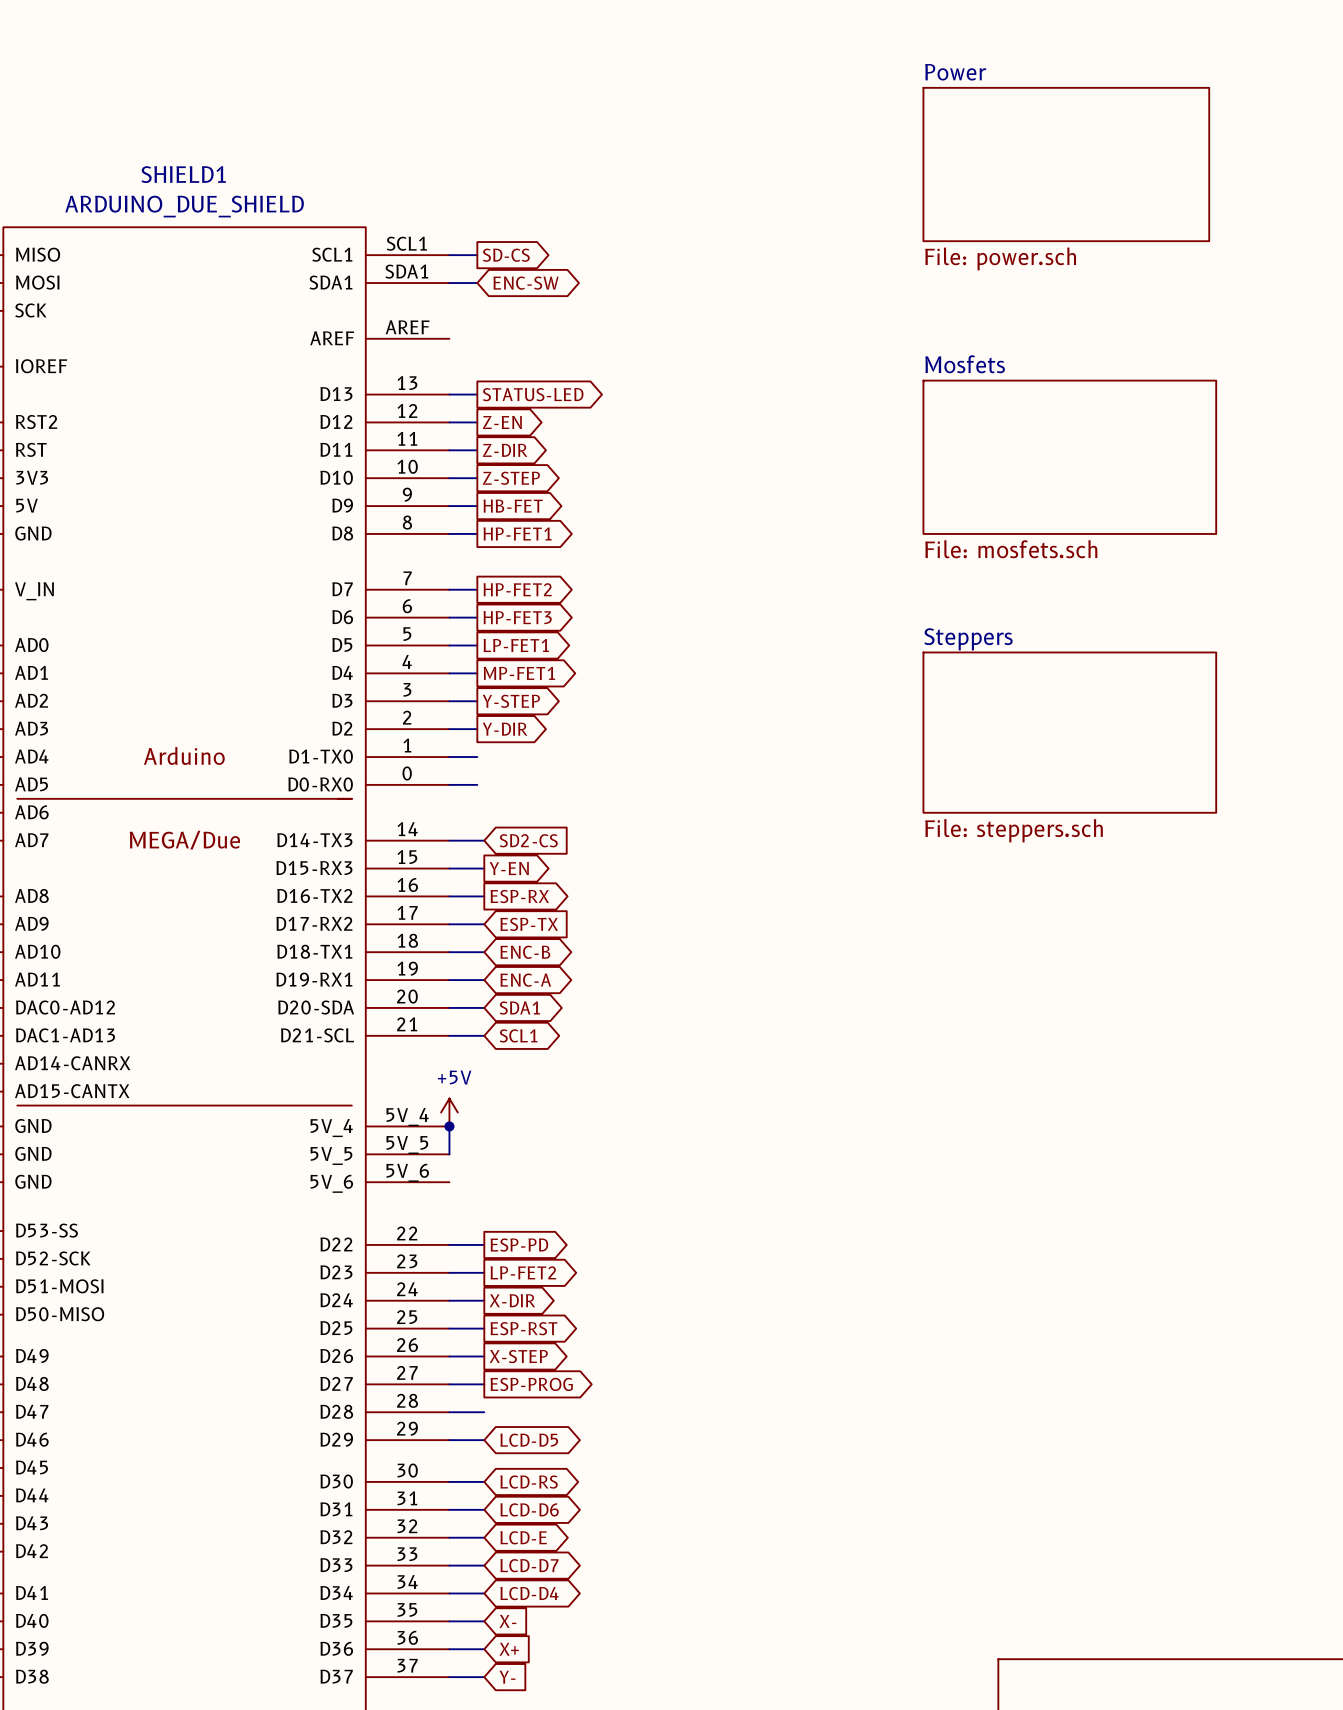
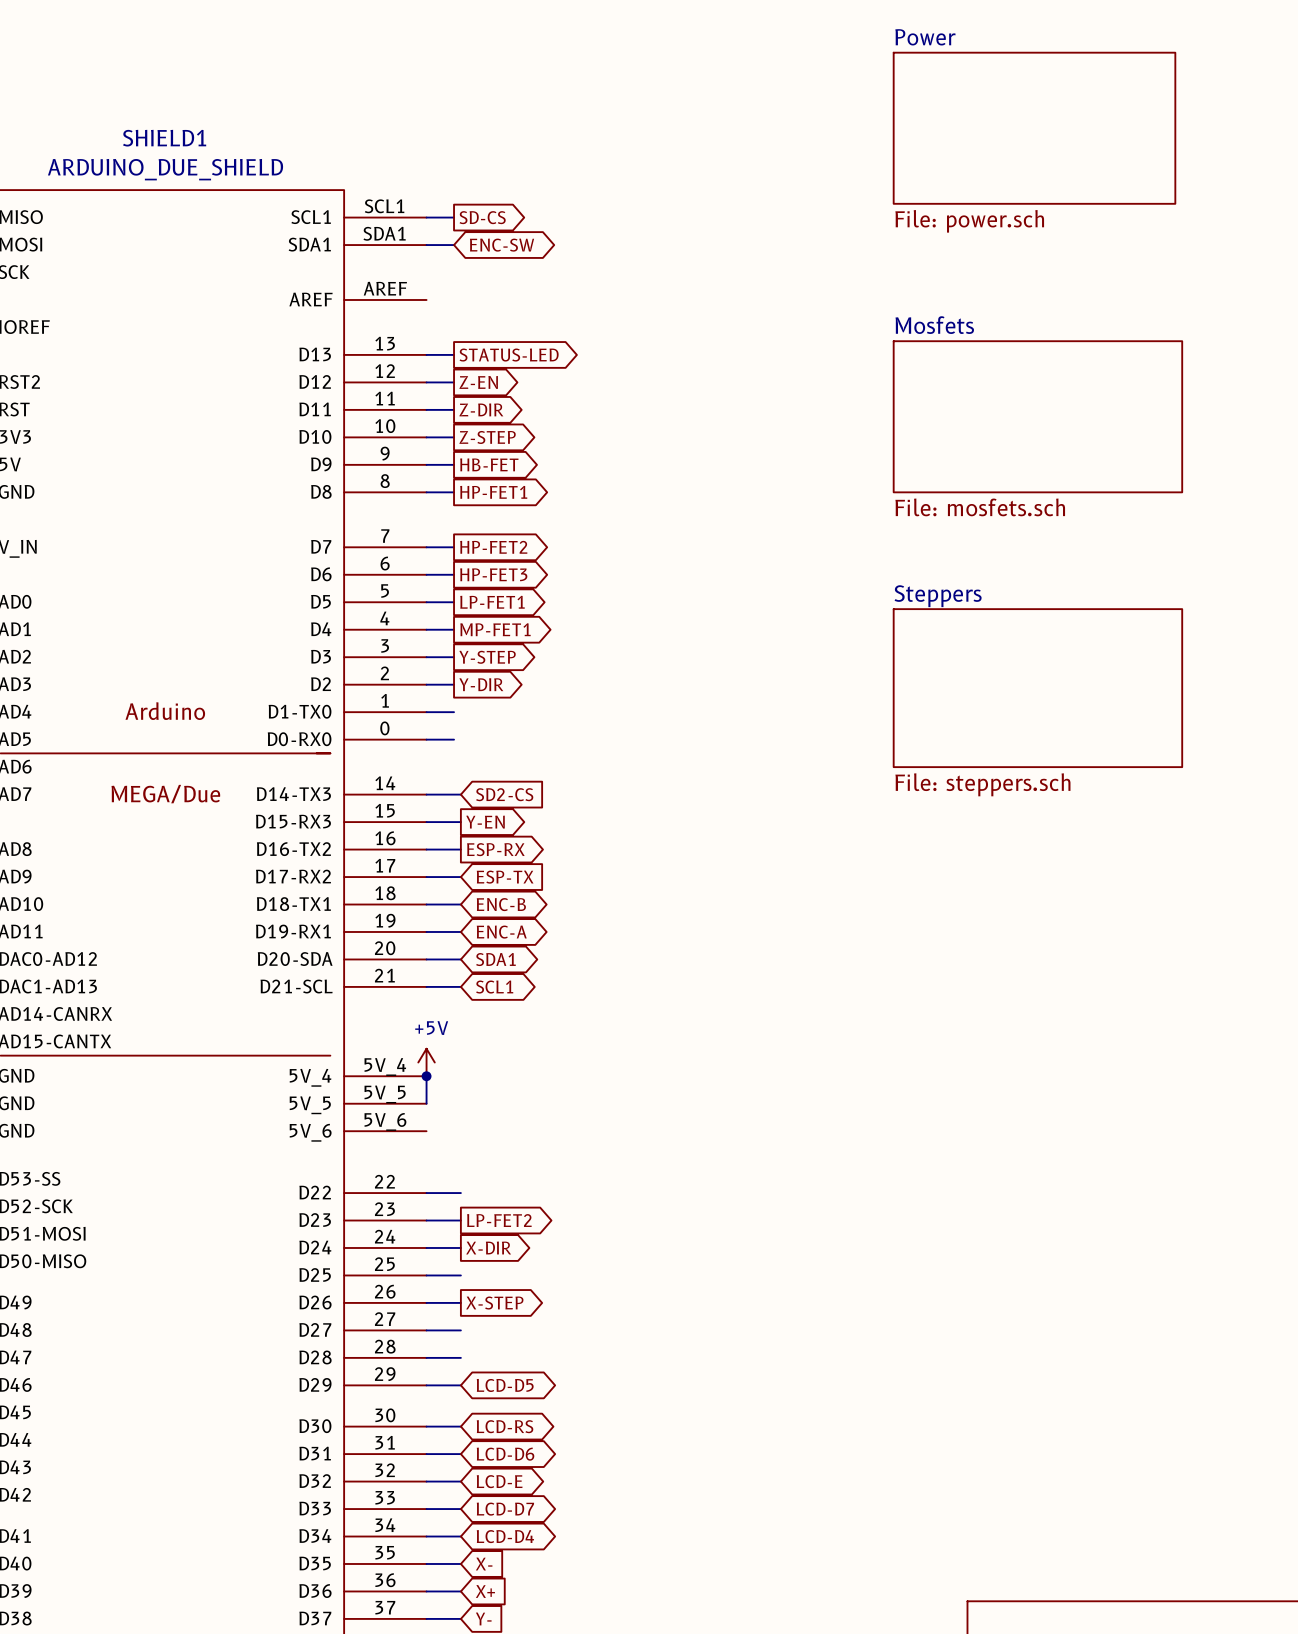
global label: ESP-PD (519, 1245) -> none
global label: ESP-RST (524, 1328) -> none
global label: ESP-PROG (531, 1384) -> none

